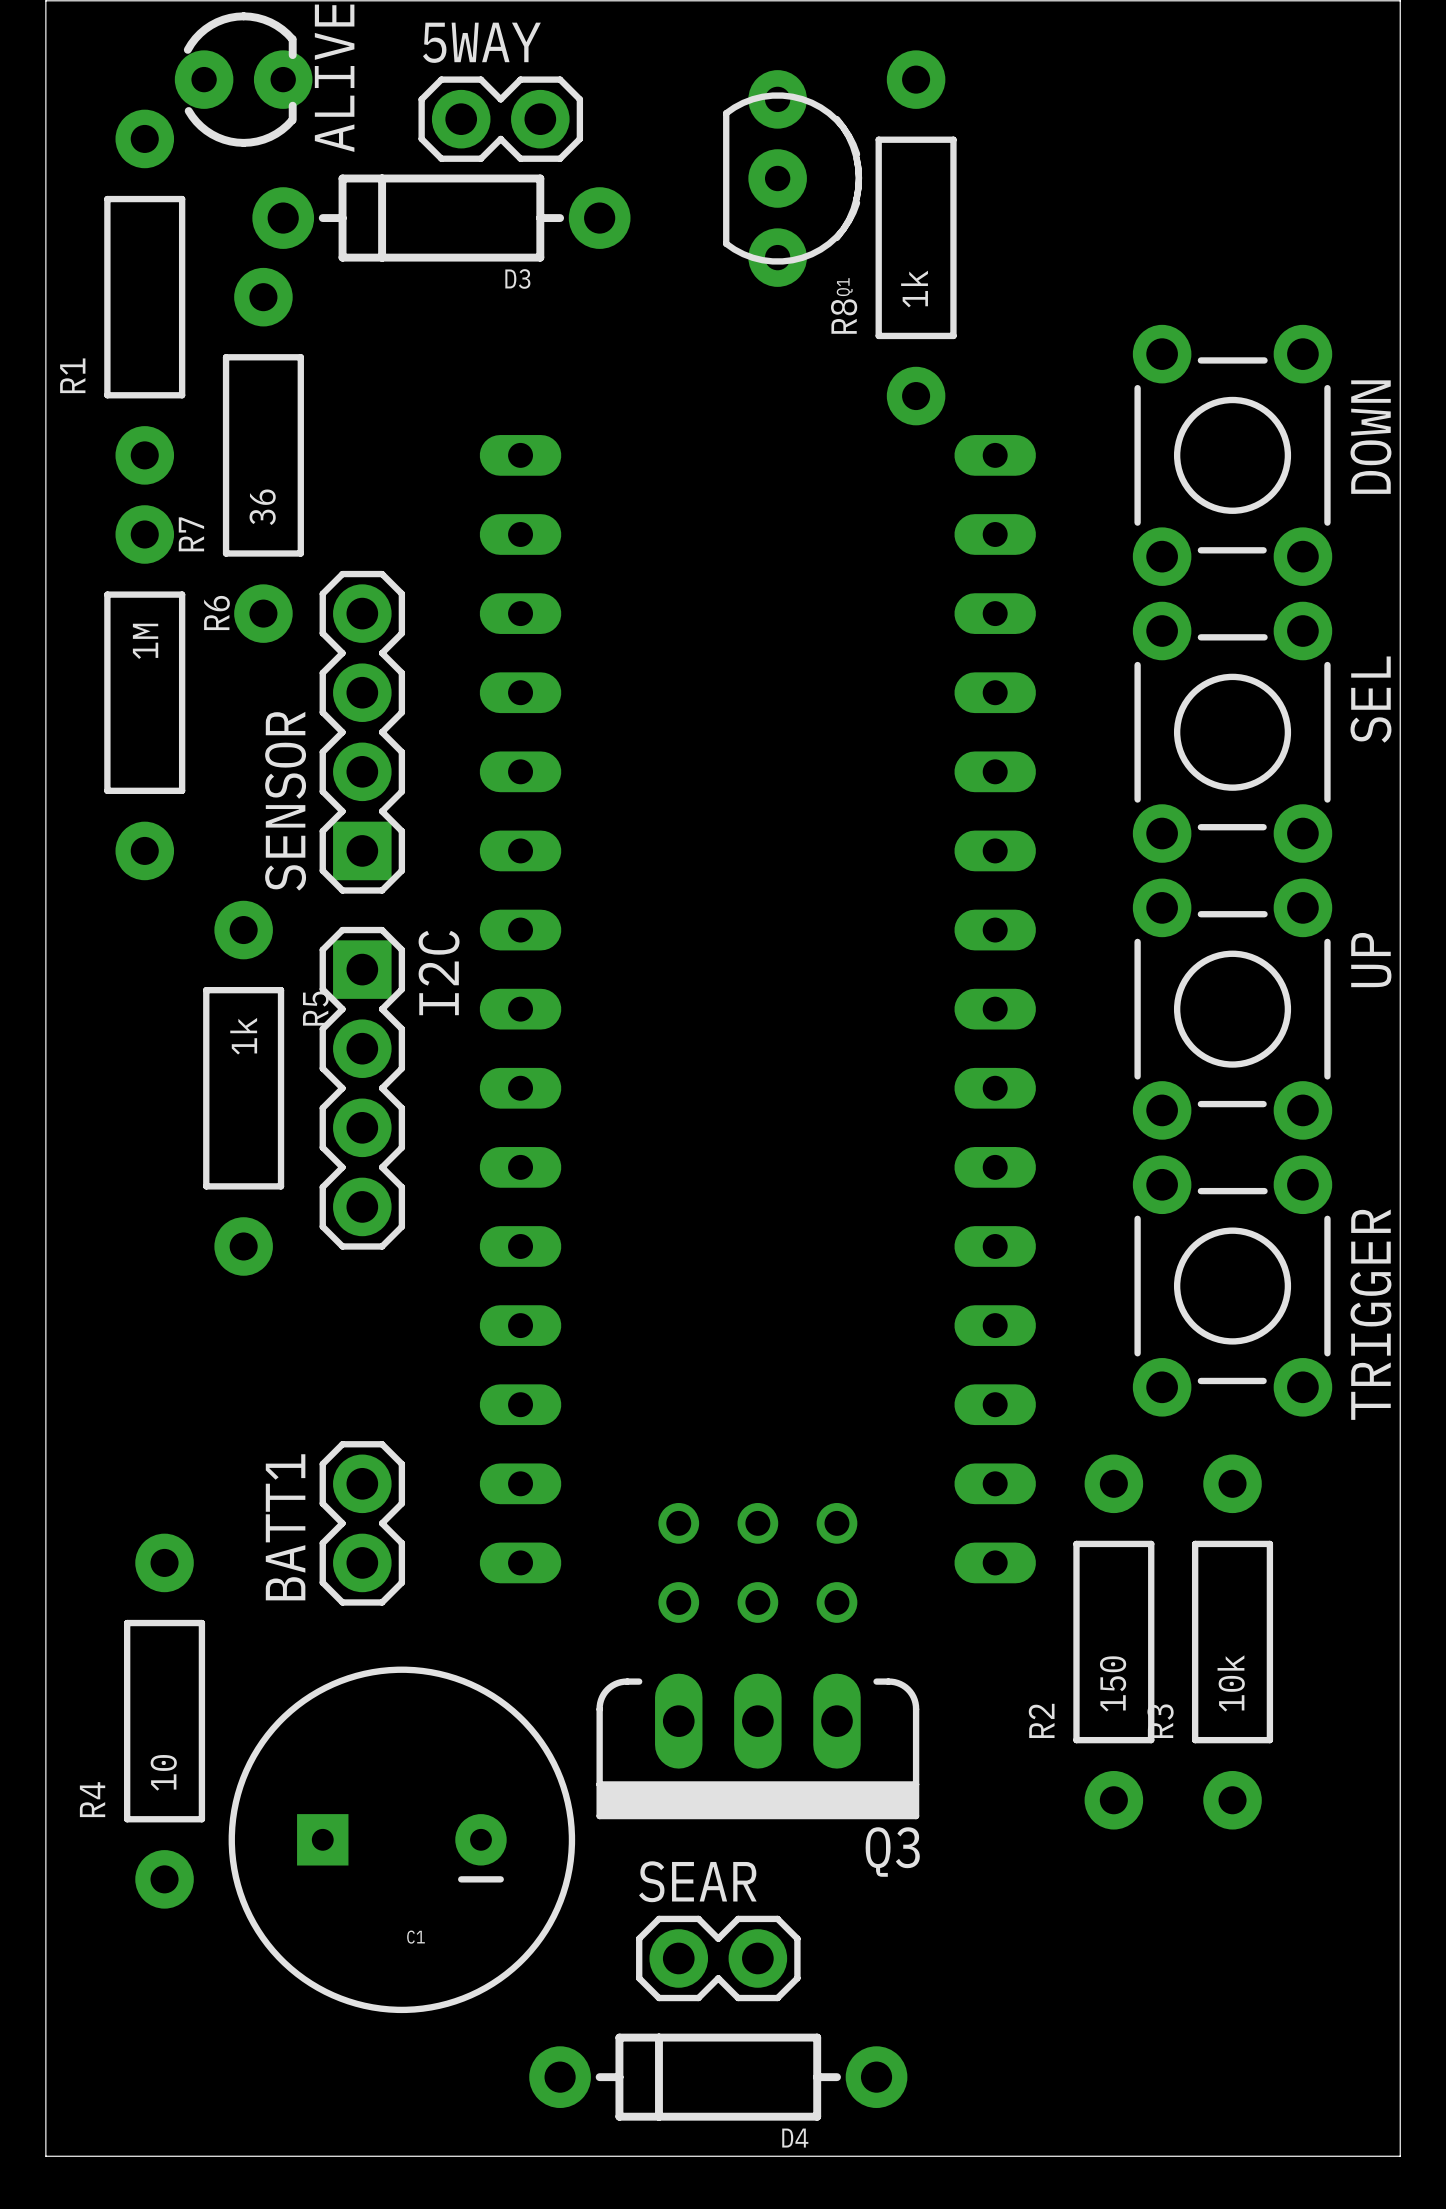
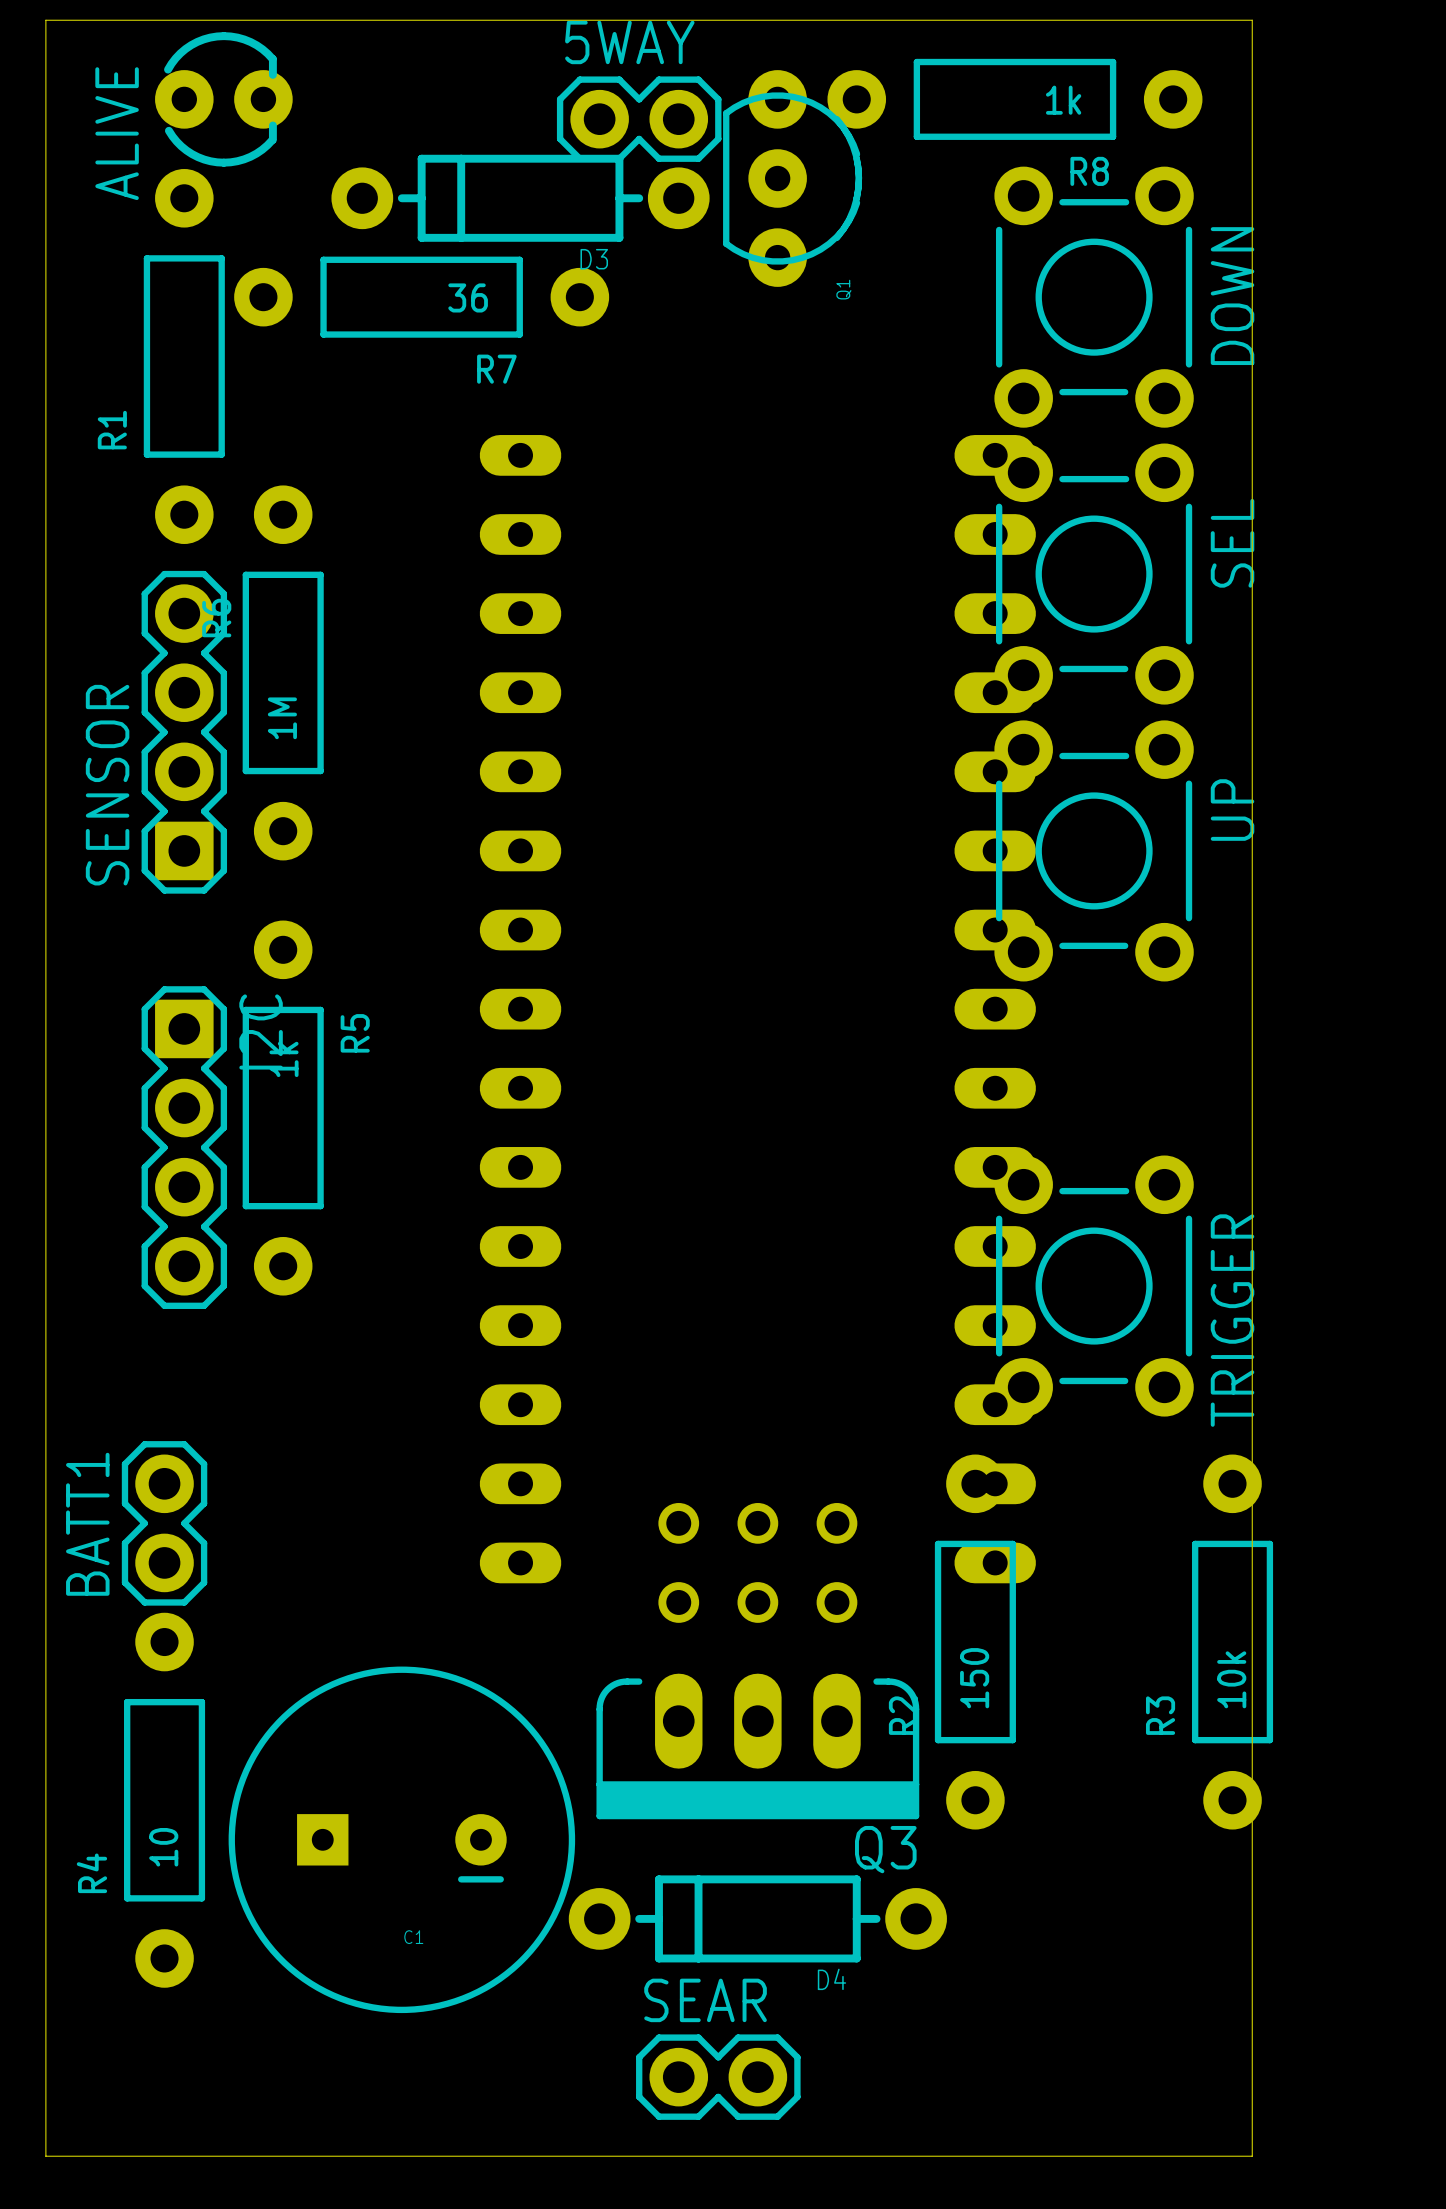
board edge: (45, 20) (45, 0) (1400, 0) (1400, 2156) (1252, 2156) -> (45, 20) (1252, 20) (1252, 2156)
ALIVE name position: ALIVE (334, 78) -> ALIVE (117, 133)
ALIVE position: (243, 79) -> (223, 99)
5WAY position: (500, 119) -> (639, 119)
D3 position: (441, 218) -> (520, 198)
R8 rotation: 0° (916, 237) -> 90° clockwise (1014, 99)
R1 position: (144, 297) -> (184, 356)
R8 name position: R8 (844, 316) -> R8 (1089, 171)
R7 rotation: 0° (263, 455) -> 90° clockwise (421, 297)
DOWN position: (1232, 455) -> (1094, 297)
R7 name position: R7 (191, 534) -> R7 (496, 369)
R6 value position: 1M (145, 641) -> 1M (282, 718)
R6 position: (144, 692) -> (283, 672)
SENSOR position: (362, 732) -> (184, 732)
SEL position: (1232, 732) -> (1094, 574)
UP position: (1232, 1009) -> (1094, 850)
R5 position: (243, 1088) -> (283, 1108)
I2C position: (362, 1088) -> (184, 1147)
TRIGGER position: (1232, 1286) -> (1094, 1286)
BATT1 position: (362, 1523) -> (164, 1523)
R2 position: (1113, 1642) -> (975, 1642)
R4 position: (164, 1721) -> (164, 1800)
SEAR position: (718, 1958) -> (718, 2077)
D4 position: (718, 2077) -> (757, 1918)

